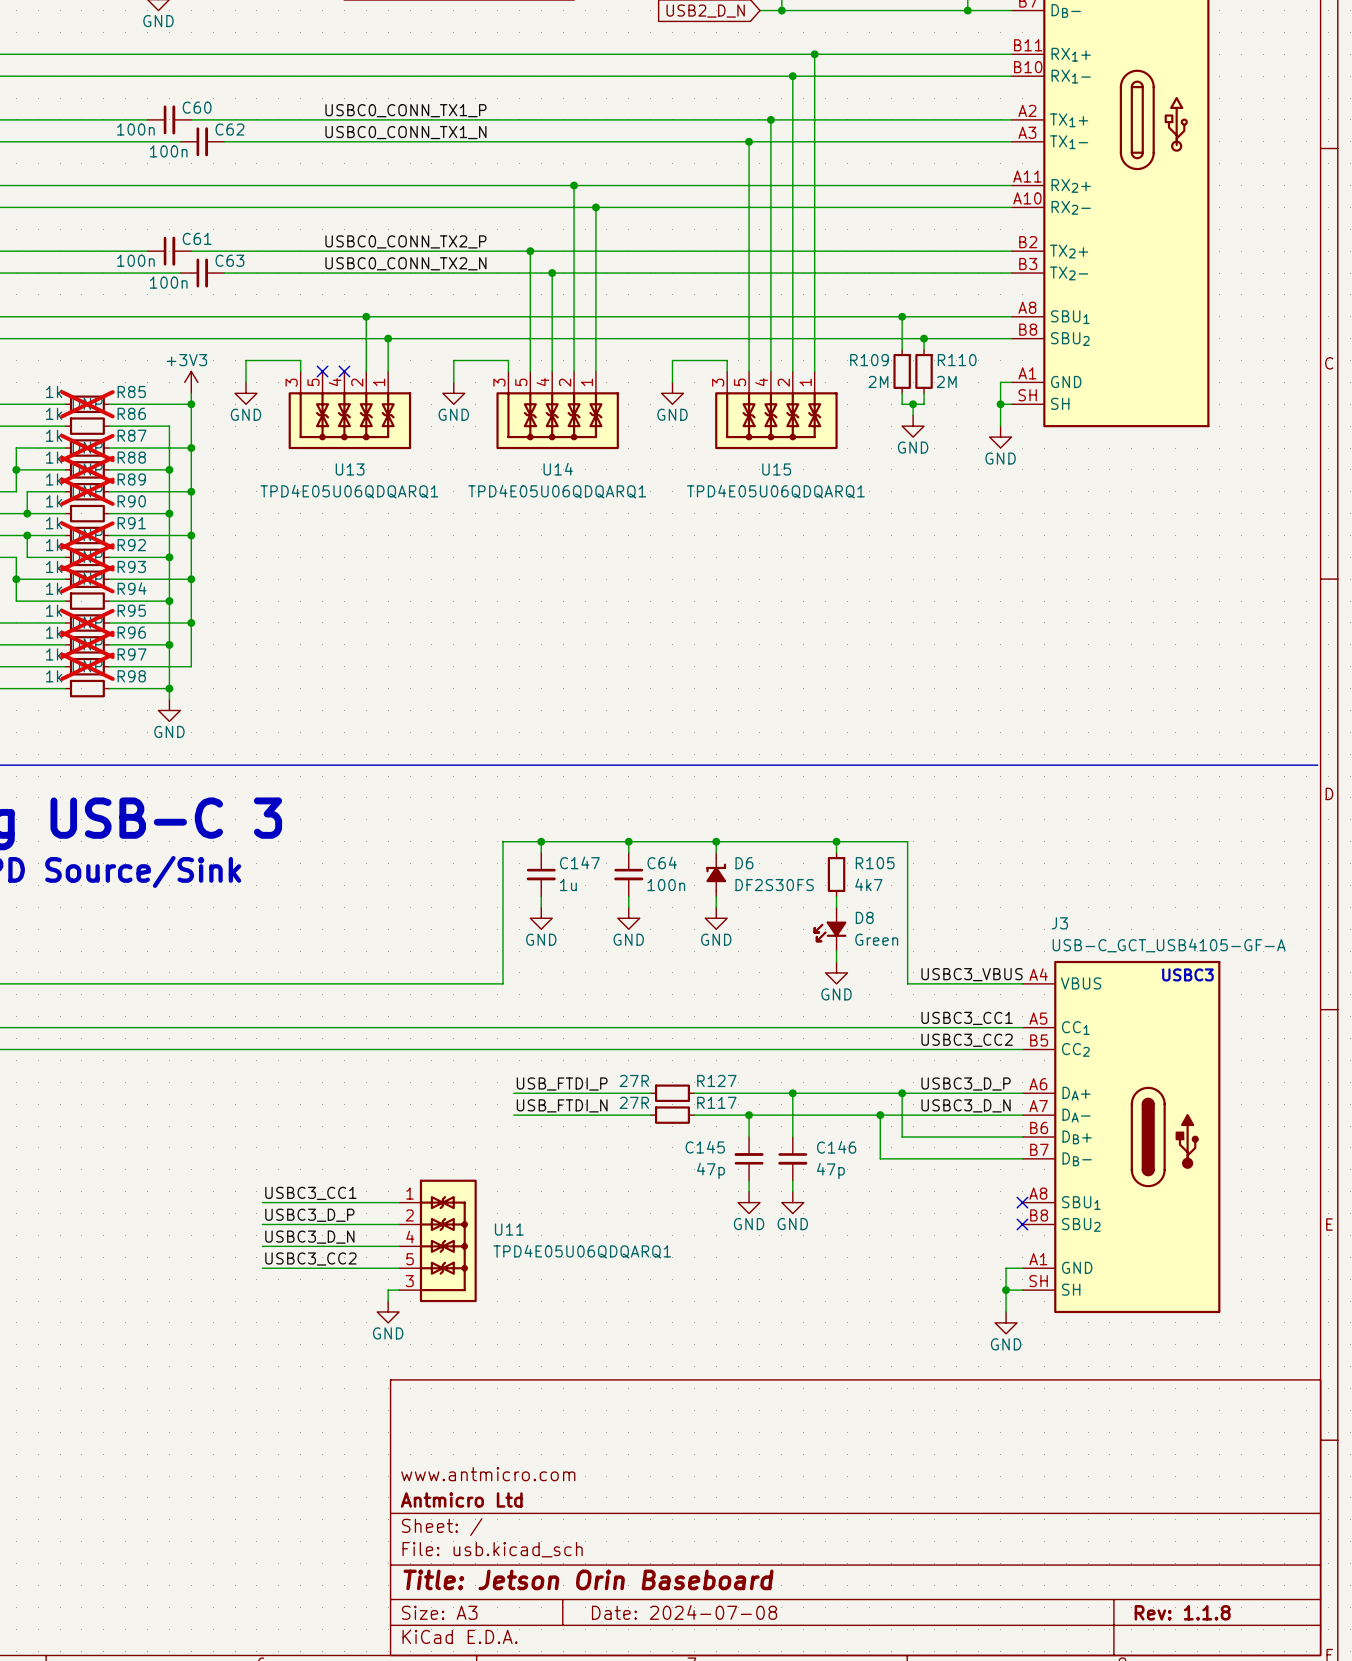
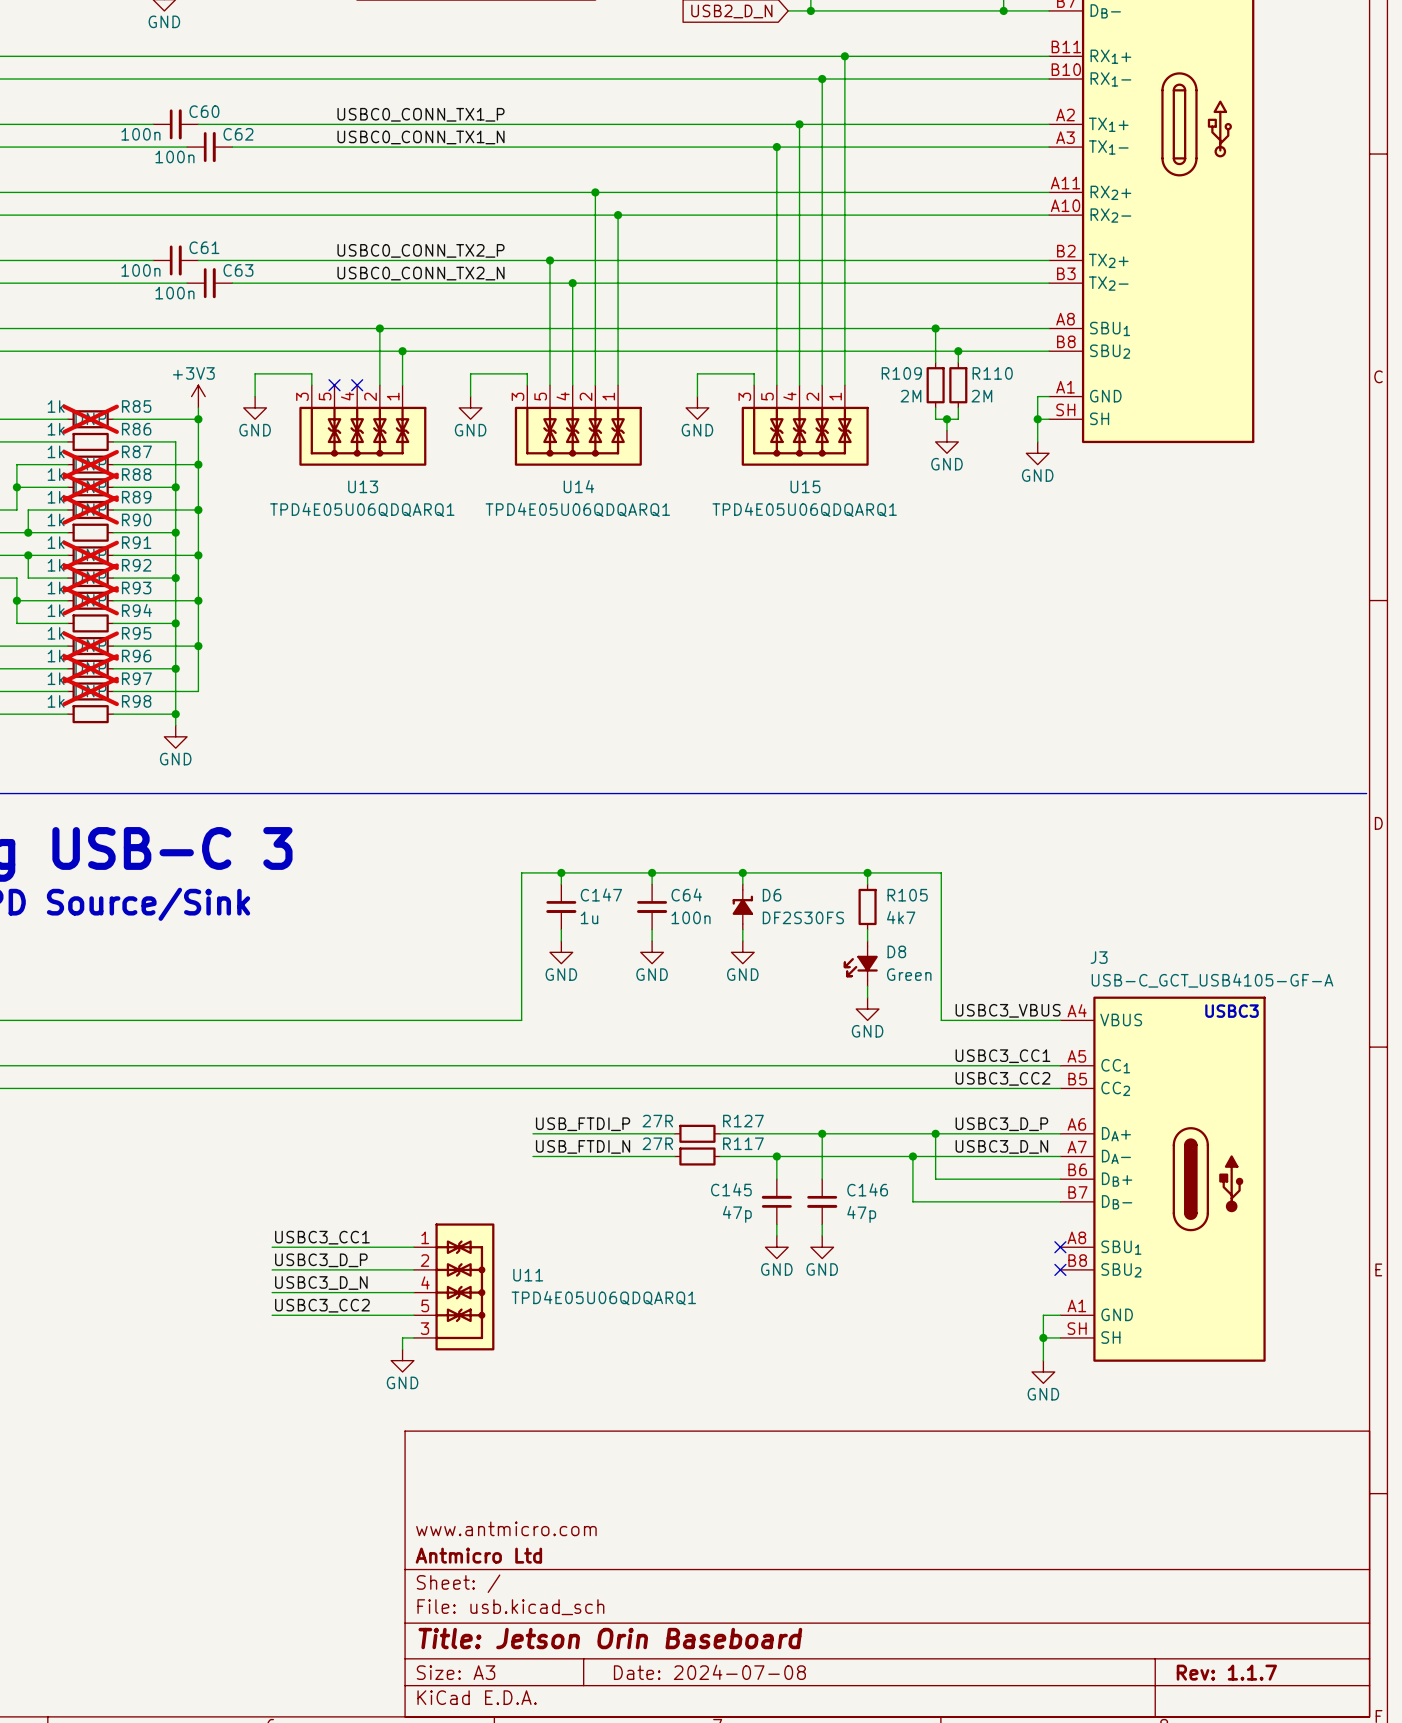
title block: Rev: 1.1.8 (1182, 1612) -> Rev: 1.1.7 (1226, 1672)

